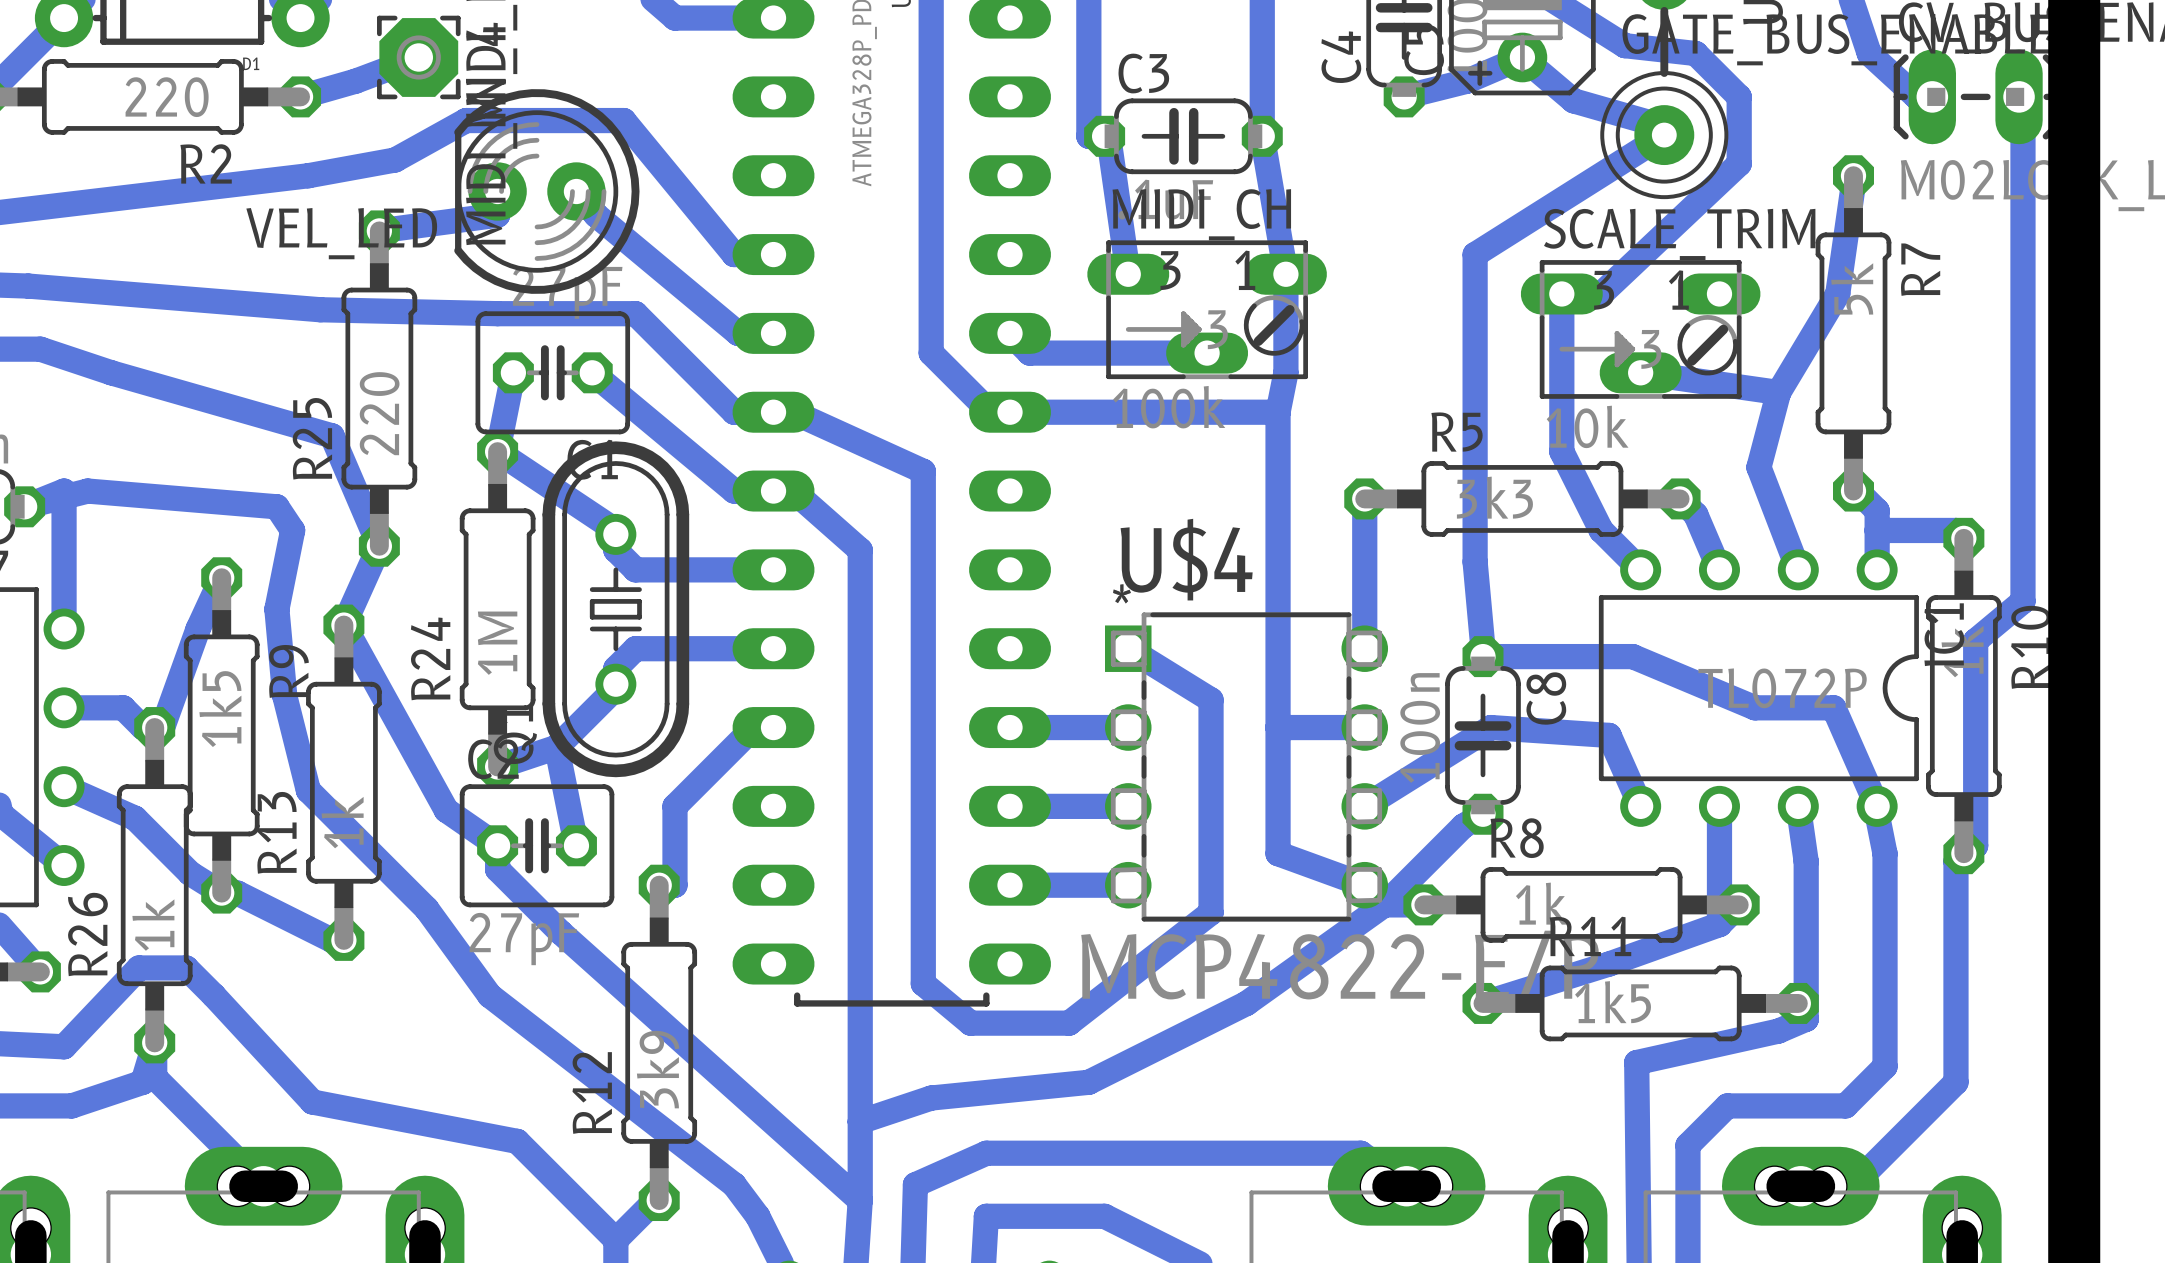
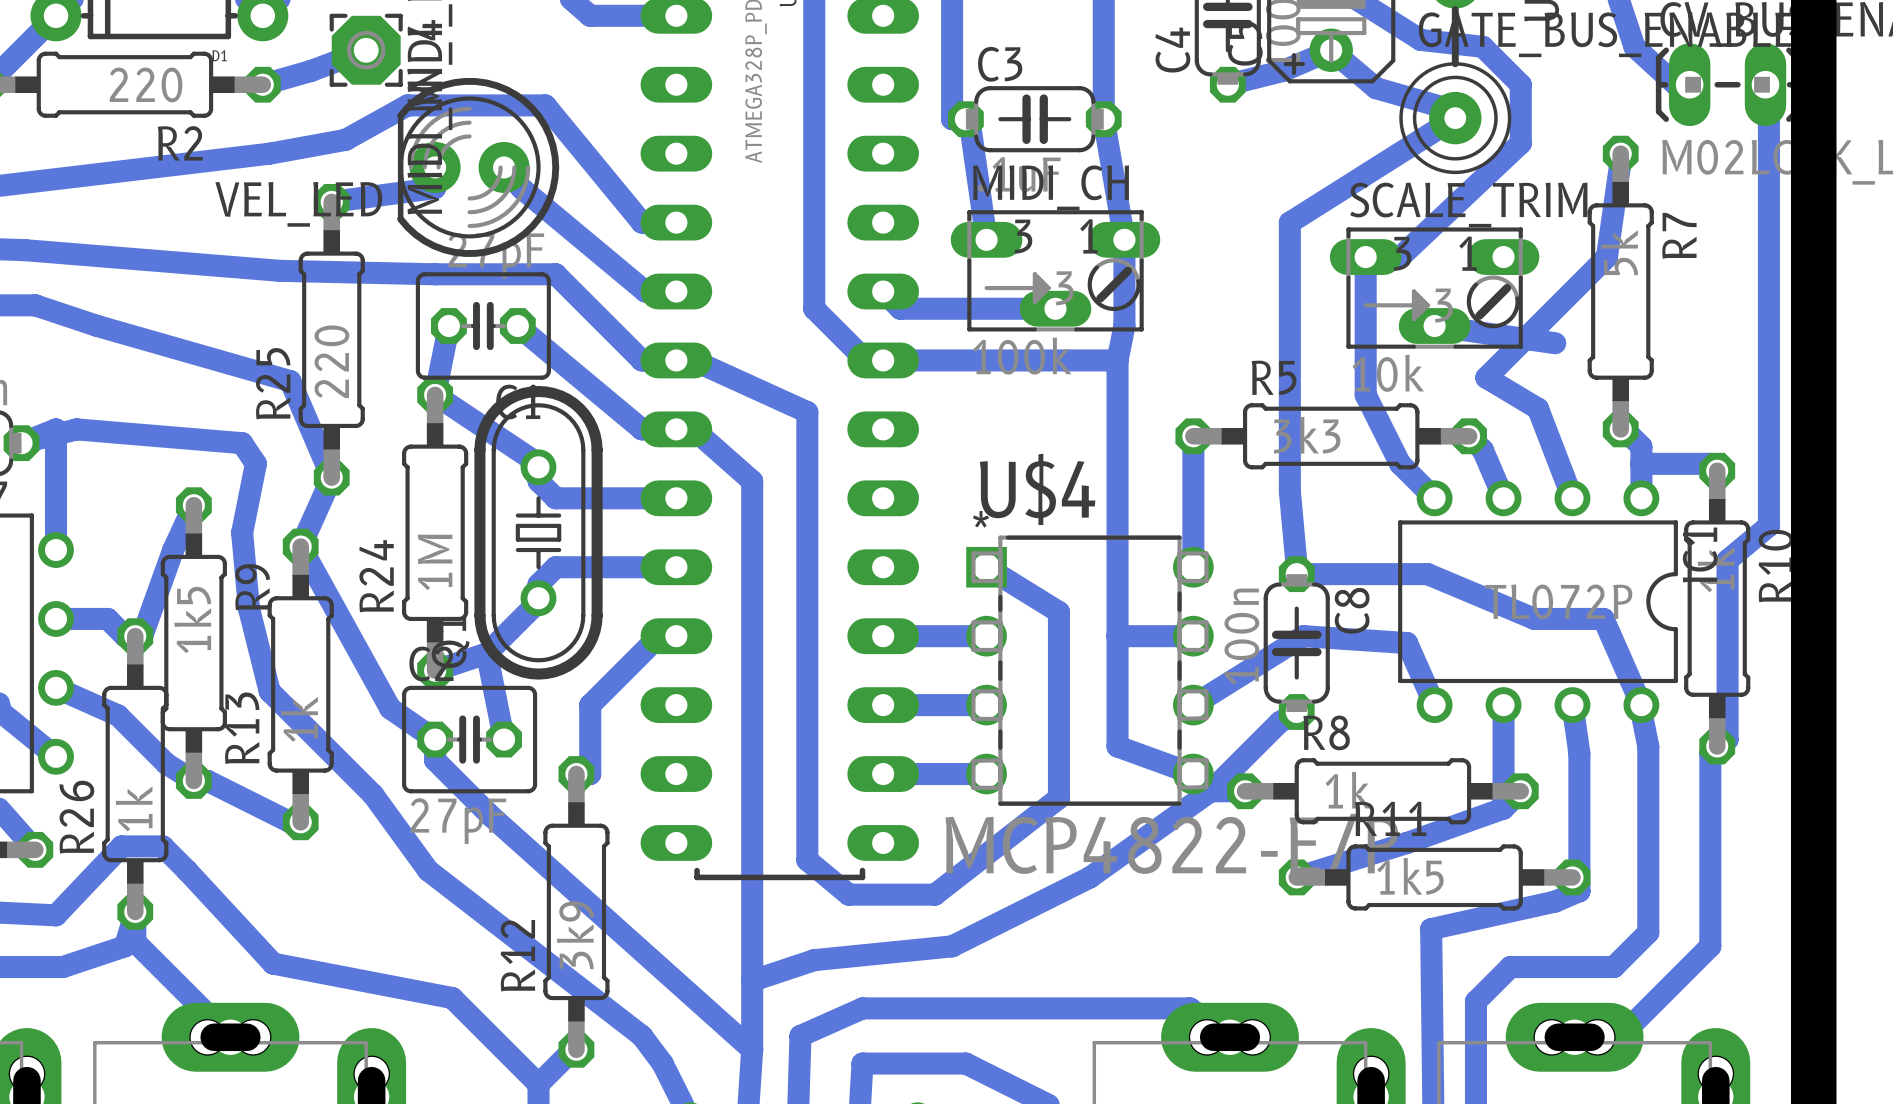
bottom track: (1837, 293) (1778, 392) (1758, 467) -> (1606, 257) (1486, 377) (1538, 408)

